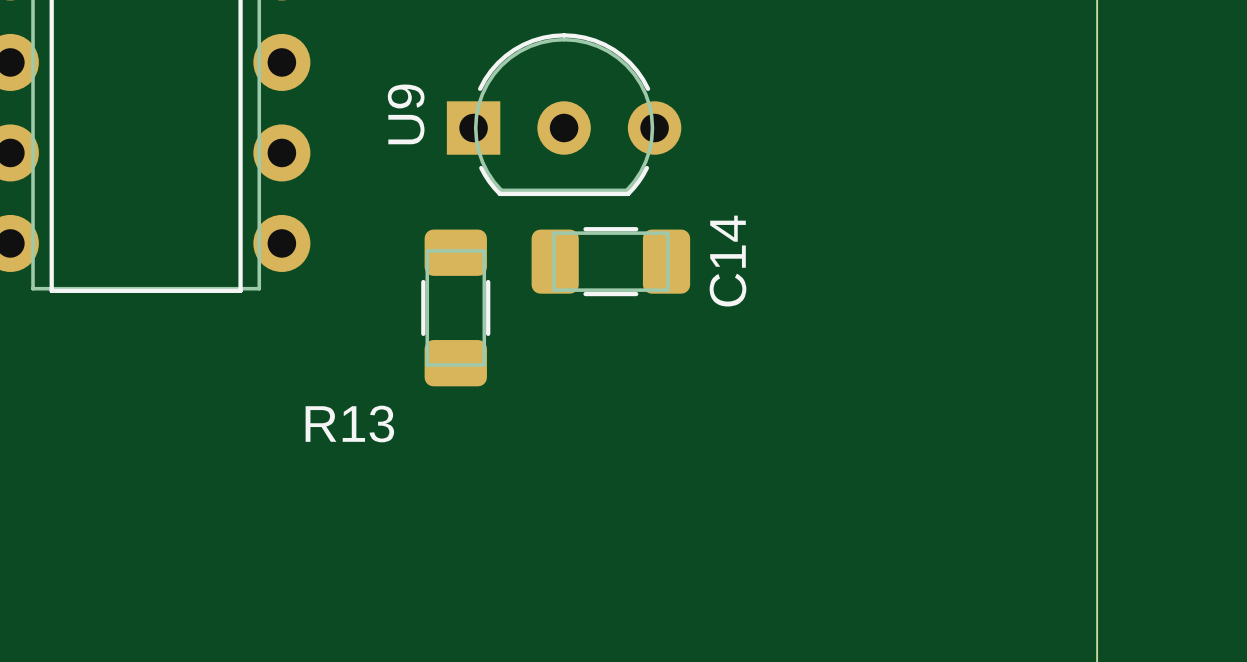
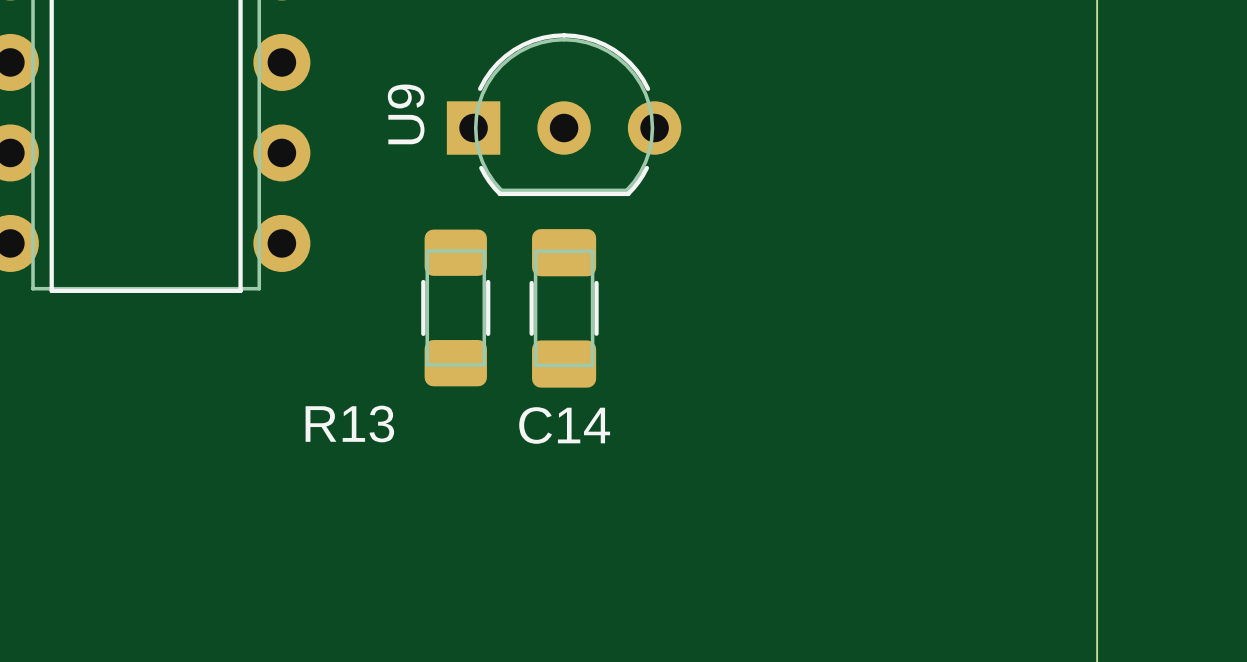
C14 rotation: 0° (610, 261) -> 90° clockwise (564, 308)

